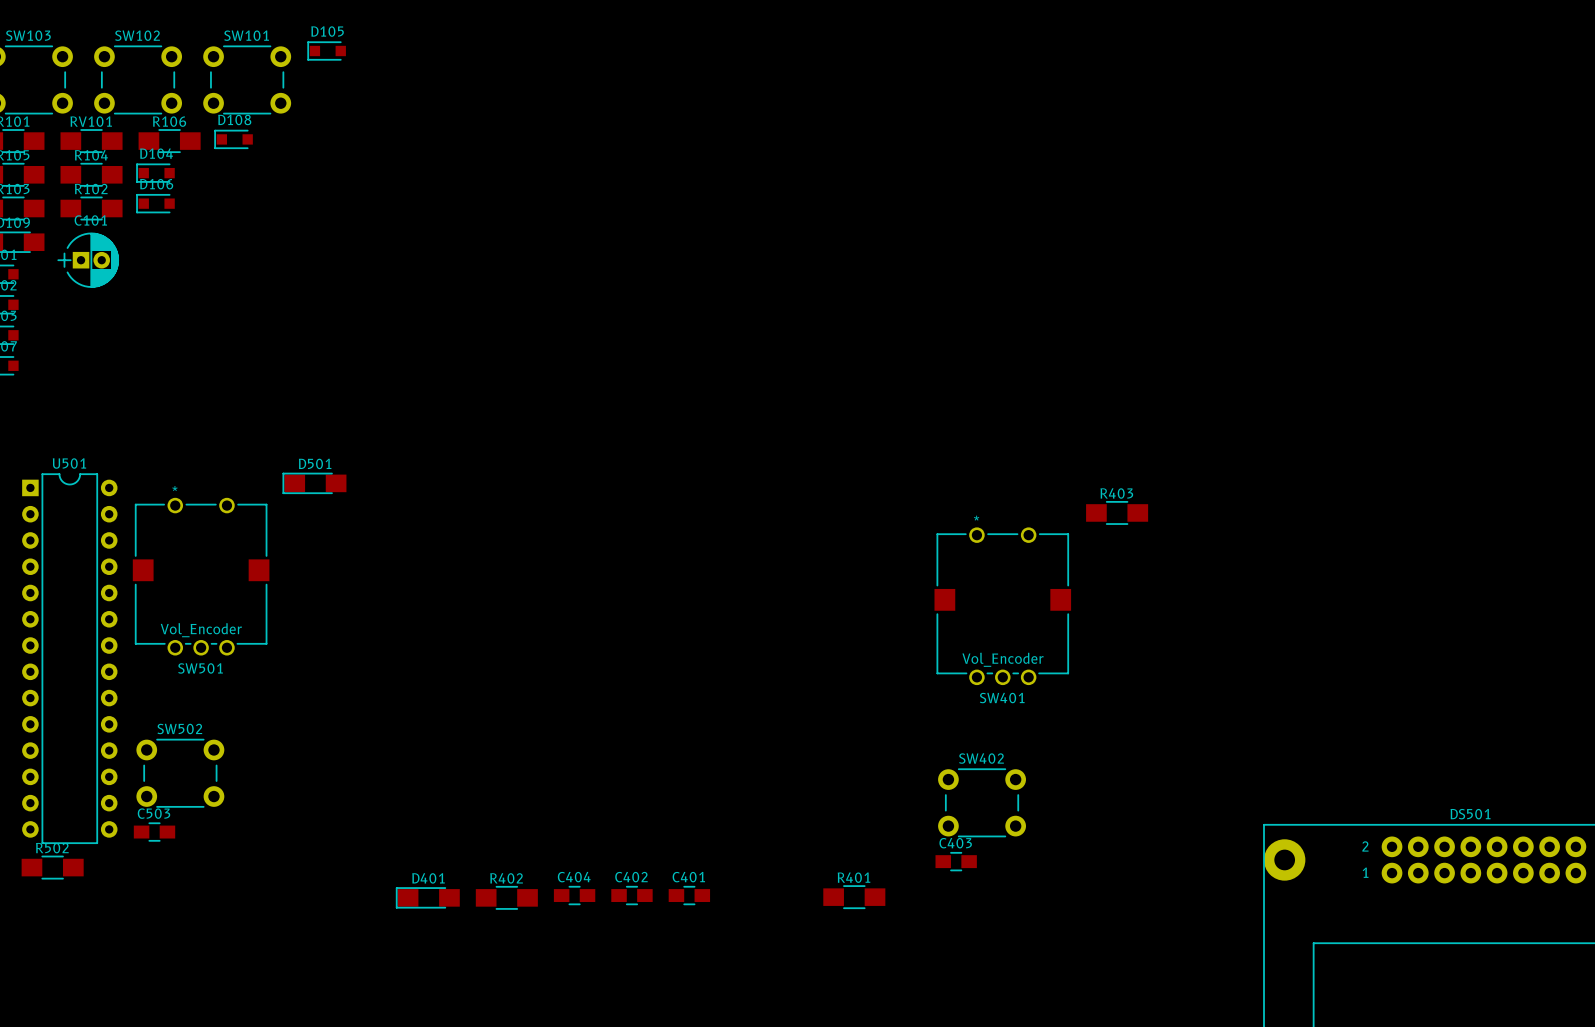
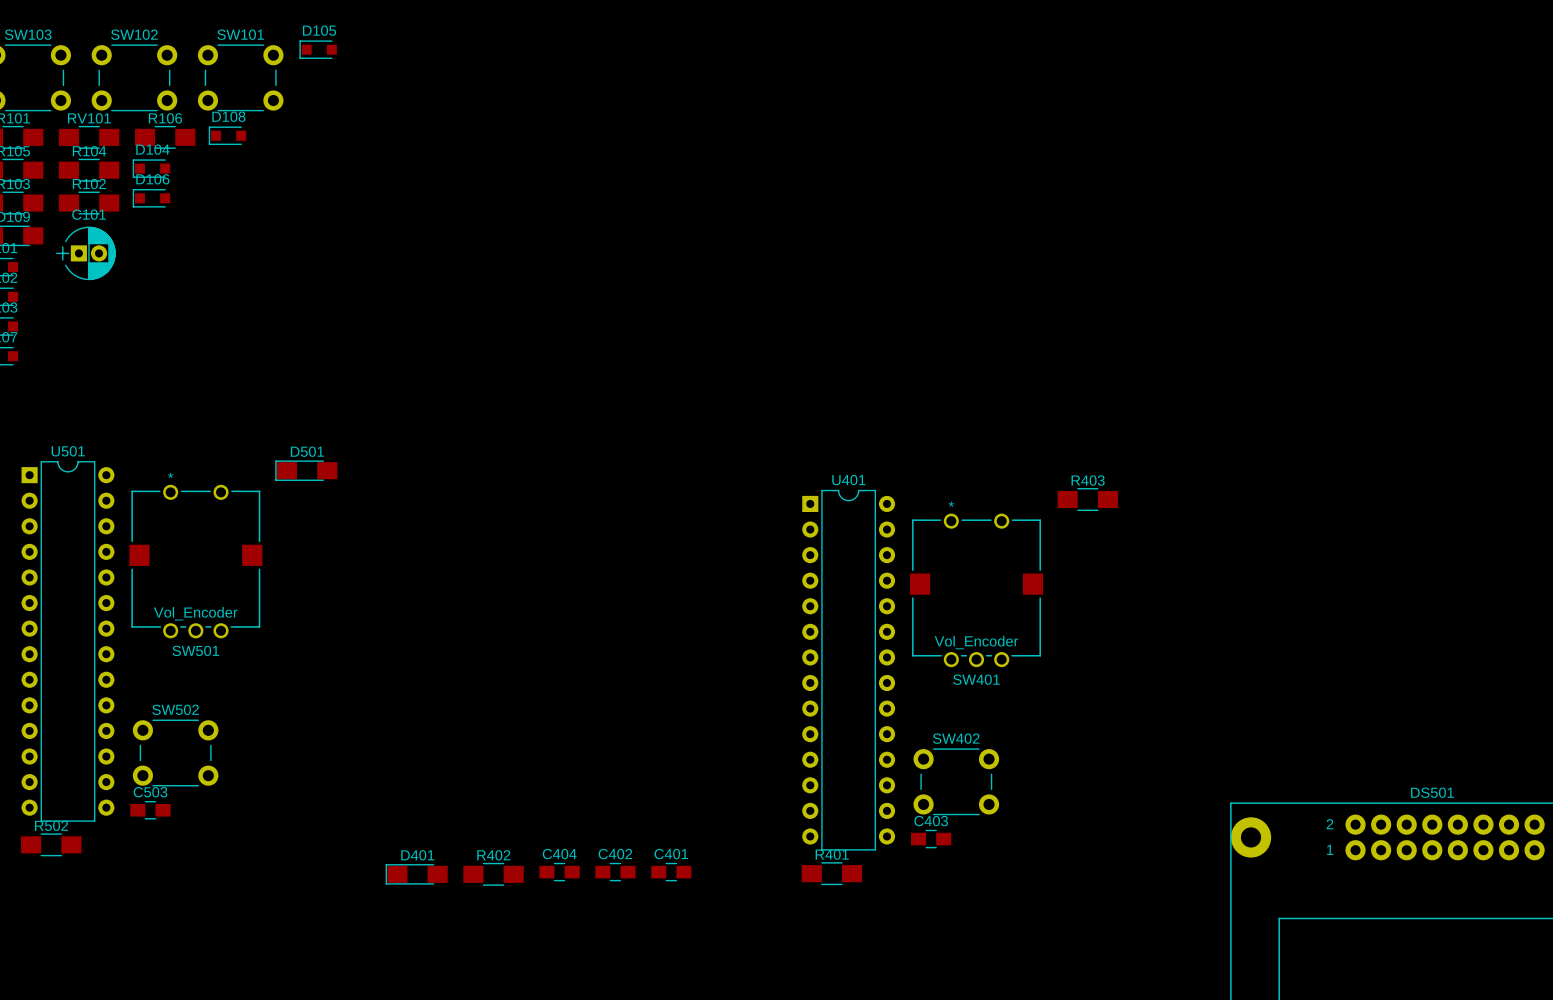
U401: none -> (848, 670)

